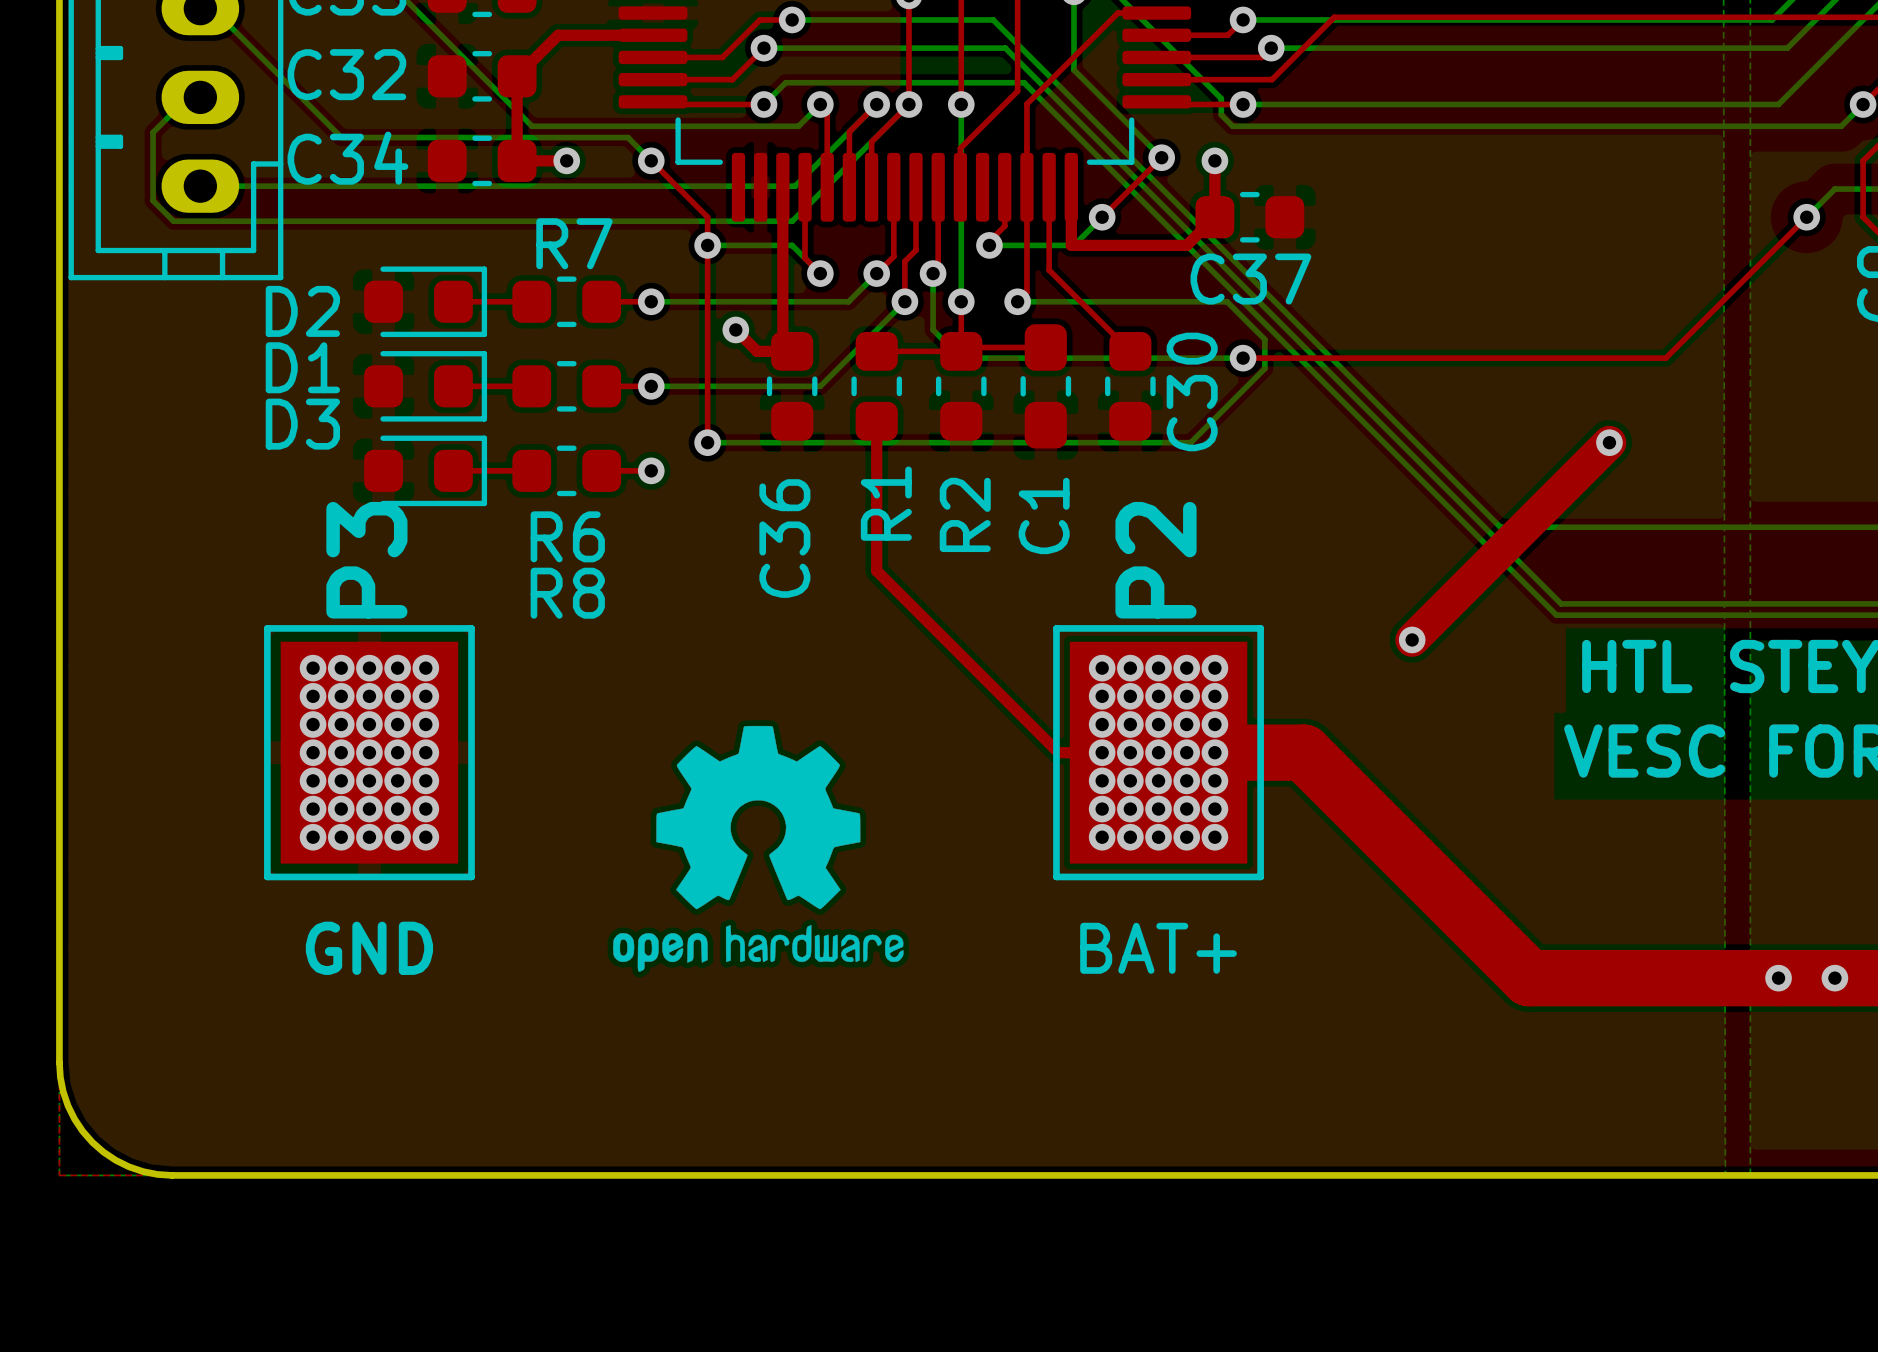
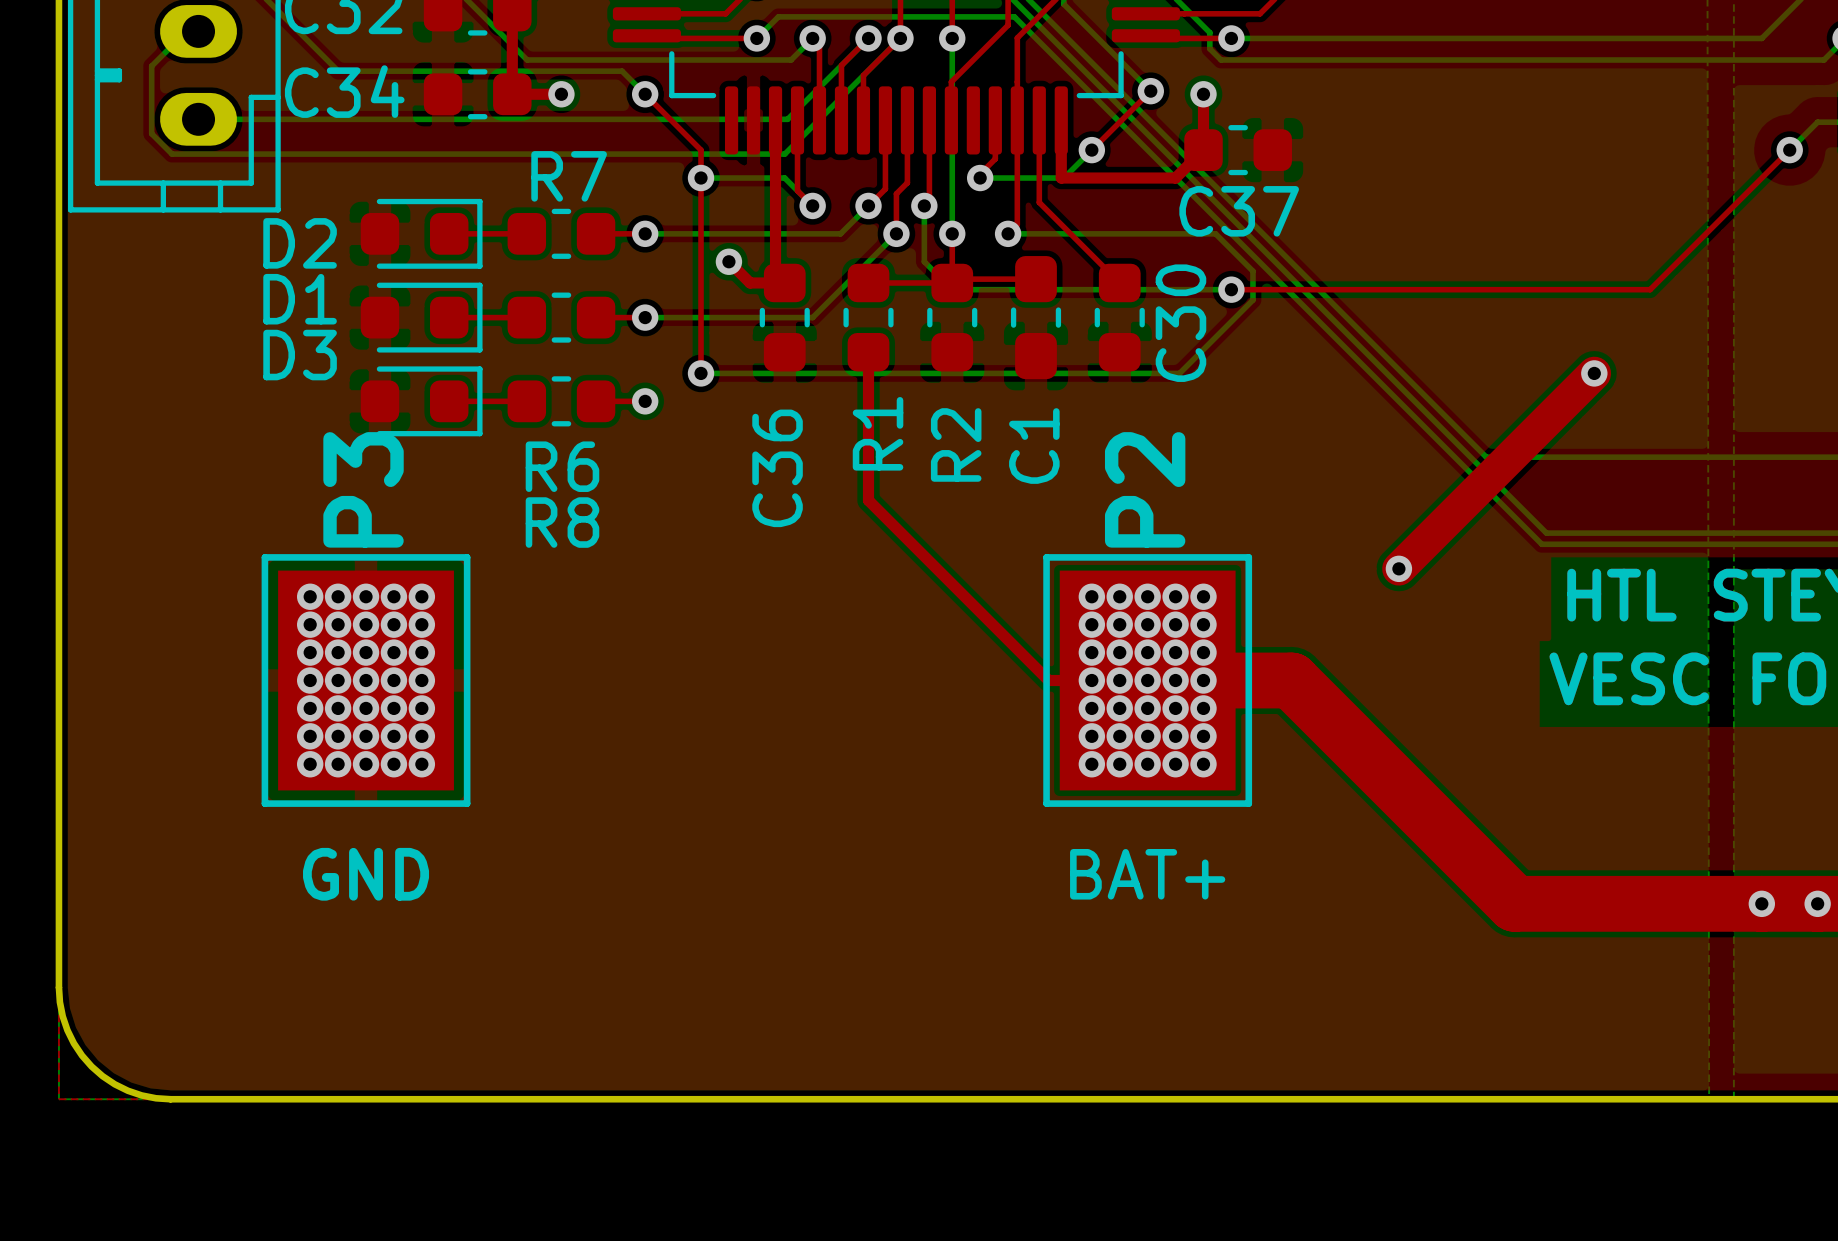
drawing: [613, 725, 904, 972] -> none

